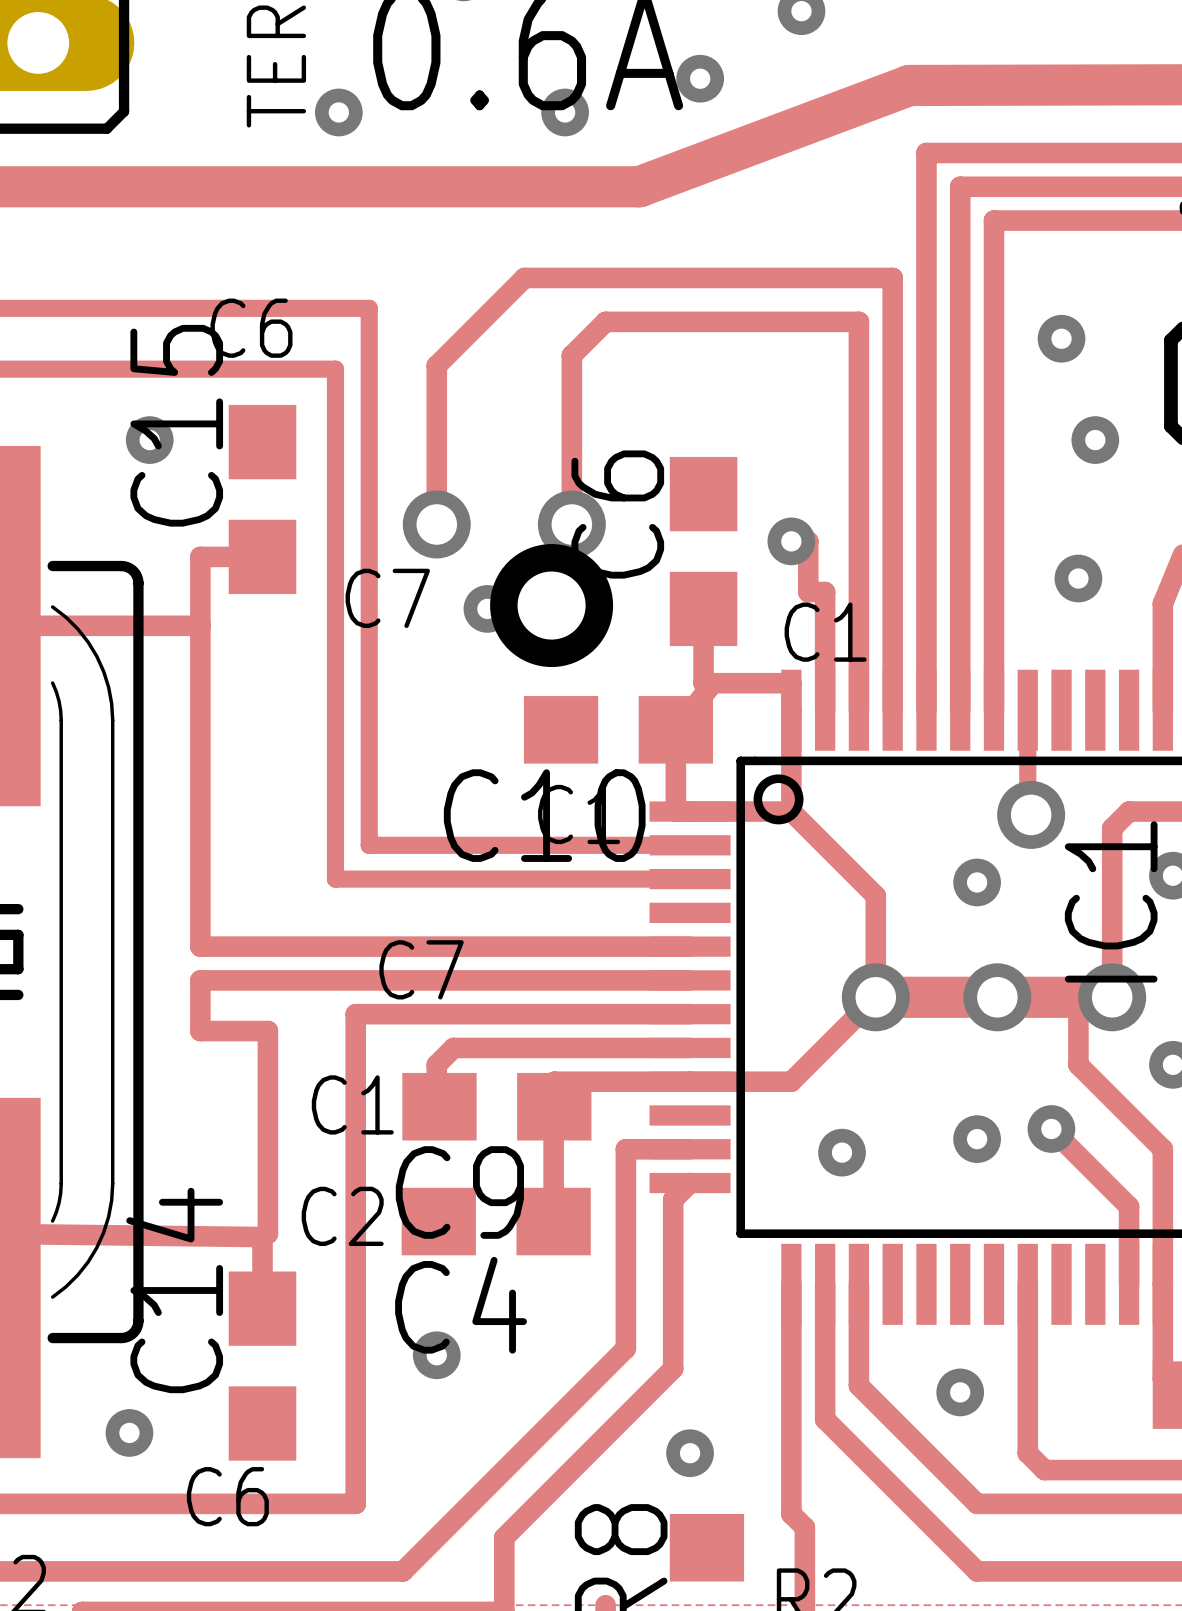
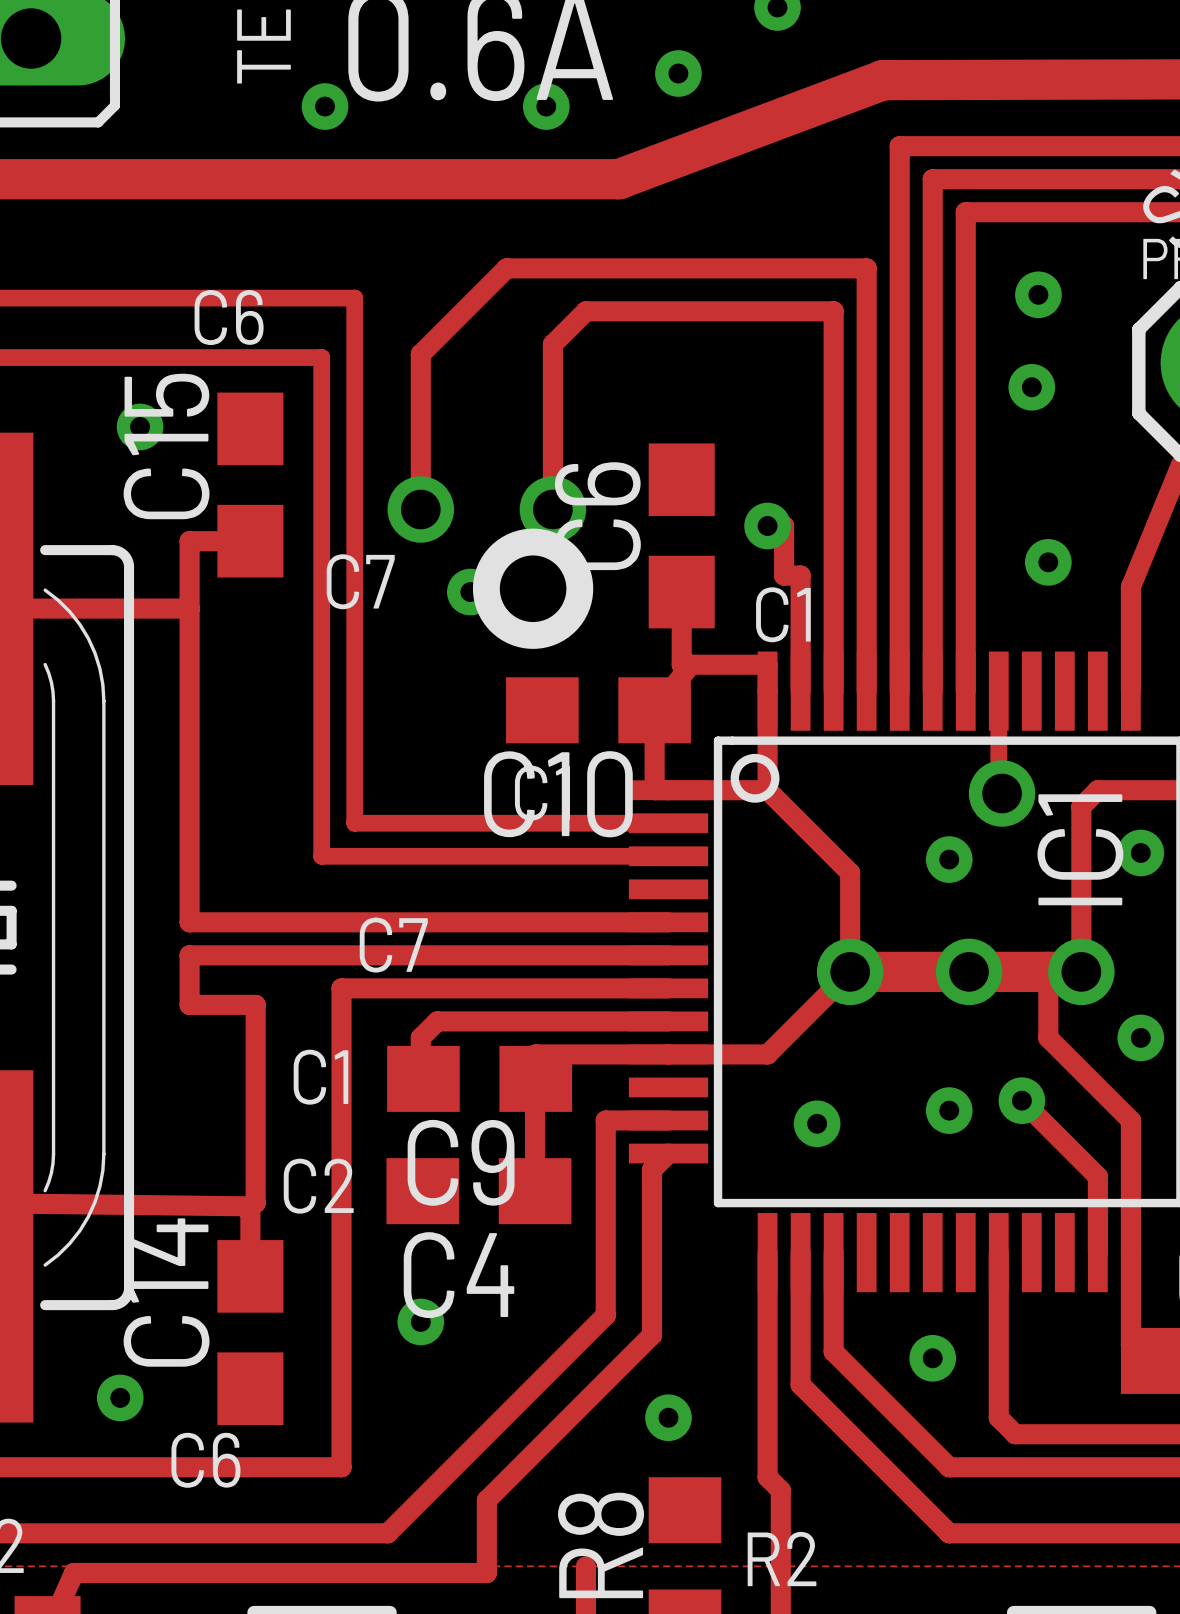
via position: (1061, 338) -> (1038, 294)
via position: (1095, 440) -> (1031, 387)

